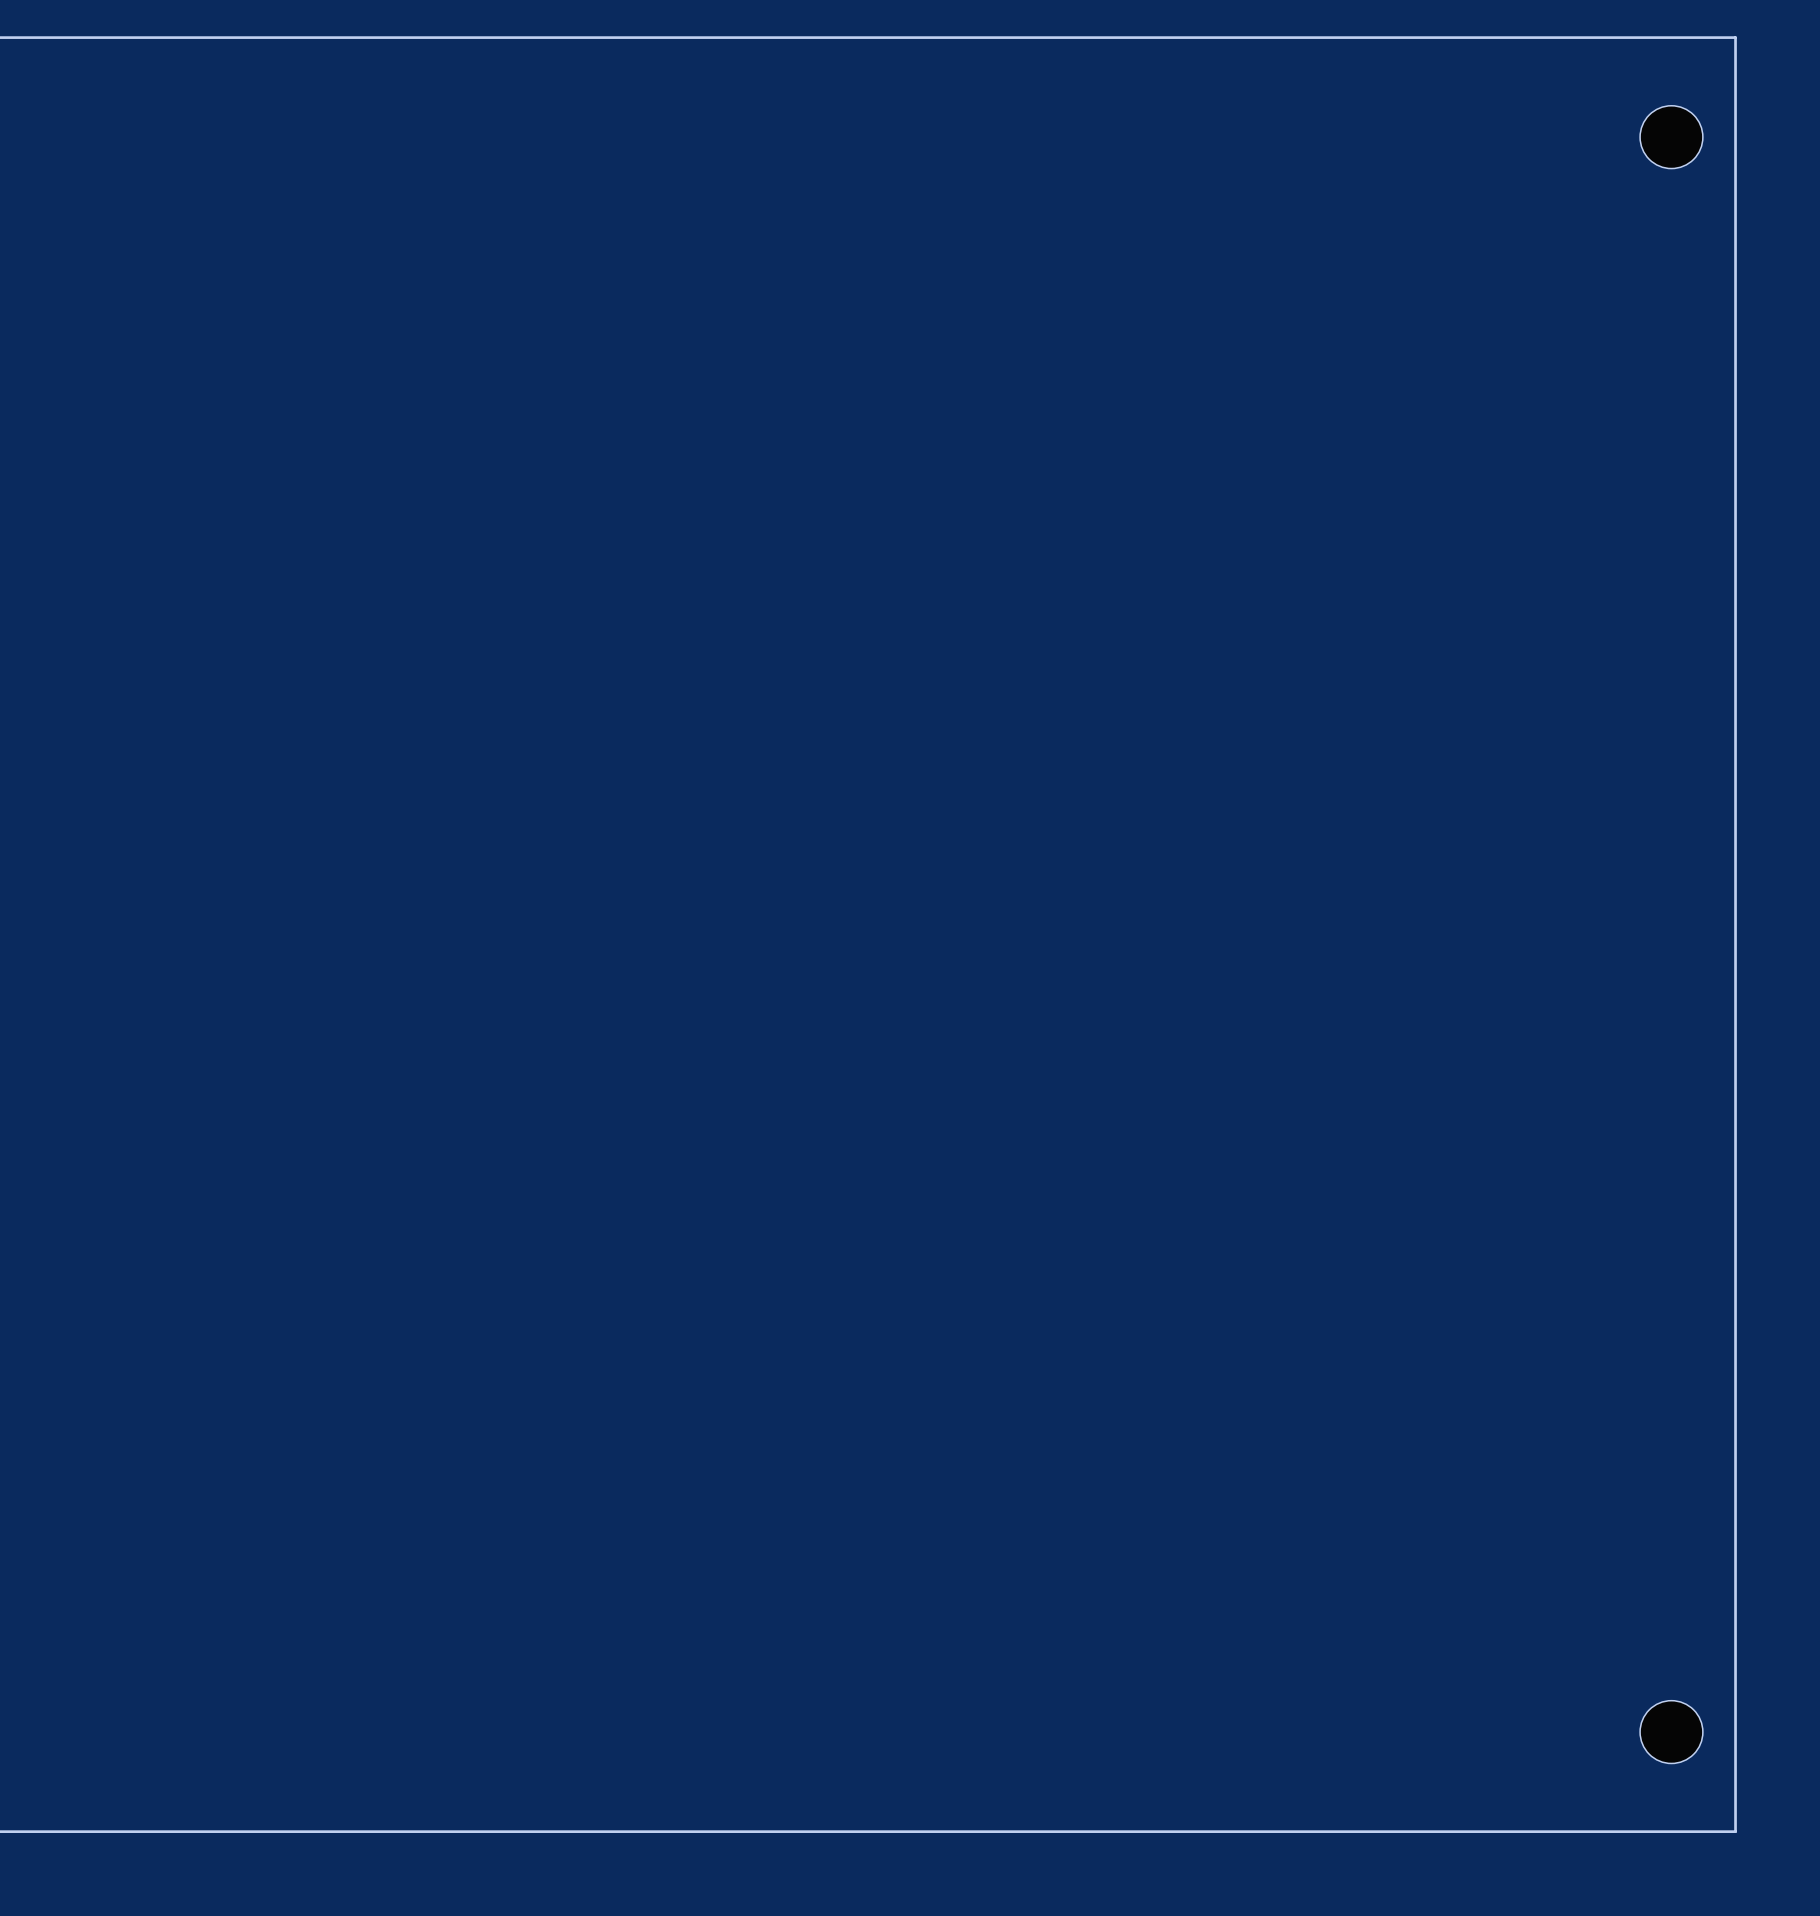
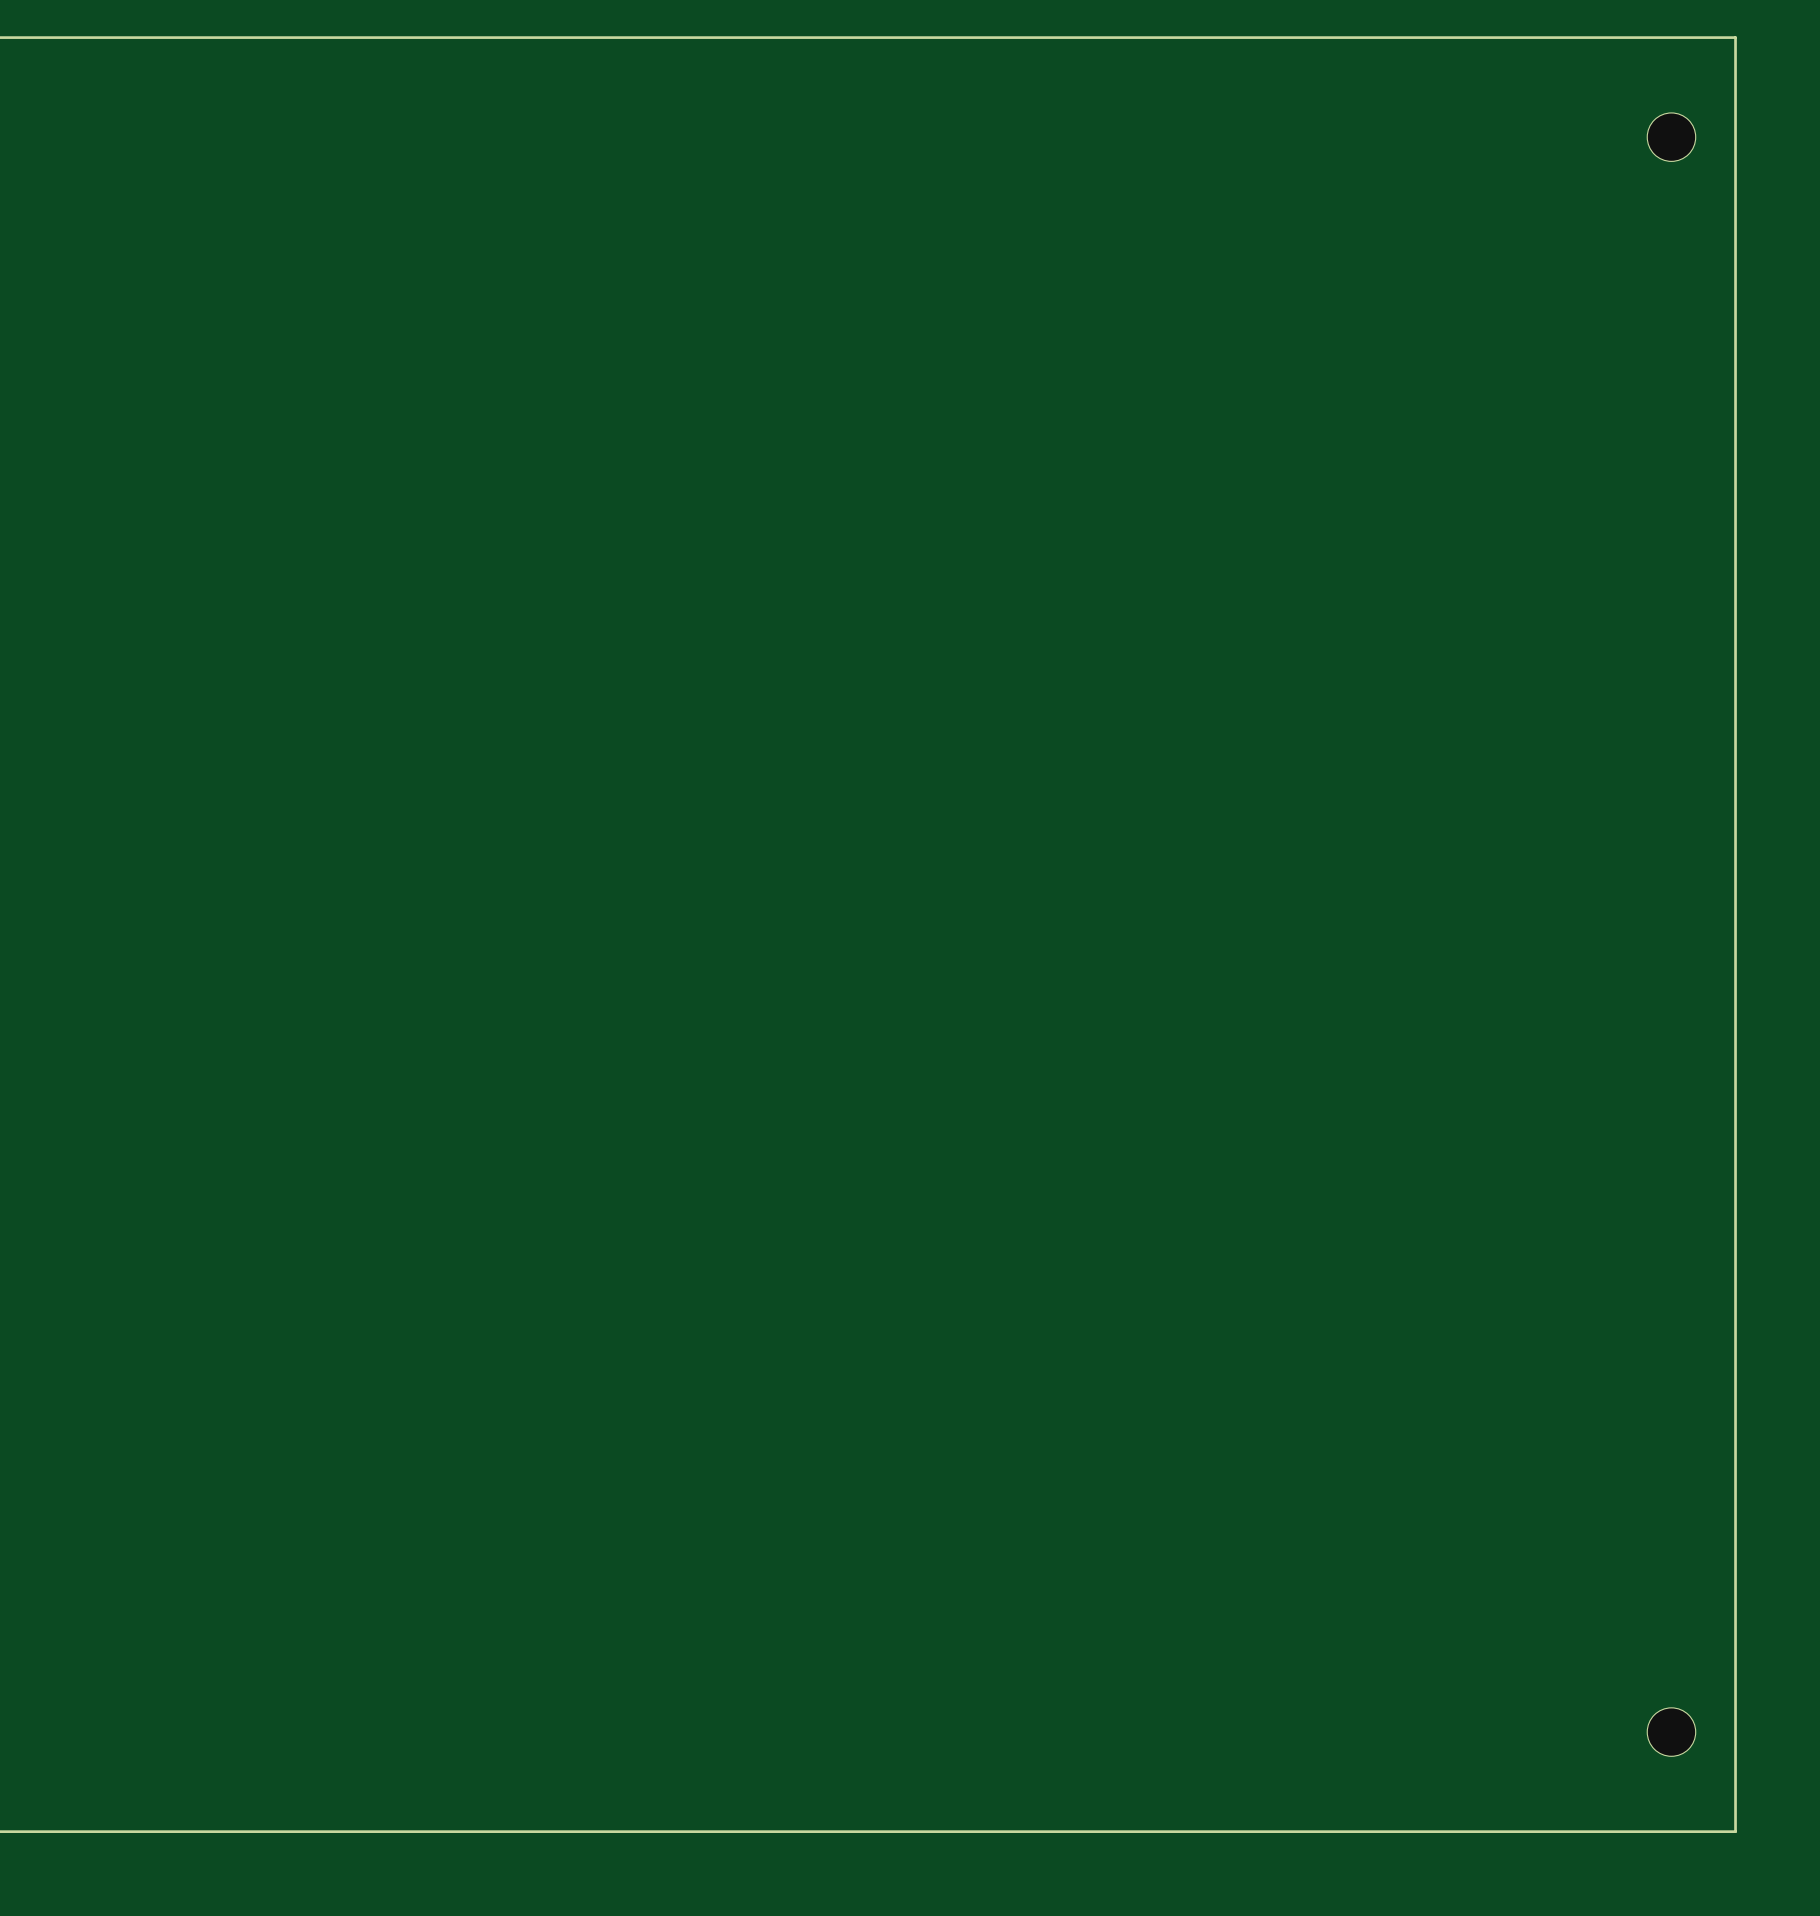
part footprint: [1640, 105, 1703, 169] -> [1647, 112, 1696, 162]
part footprint: [1640, 1700, 1703, 1764] -> [1647, 1707, 1696, 1757]

